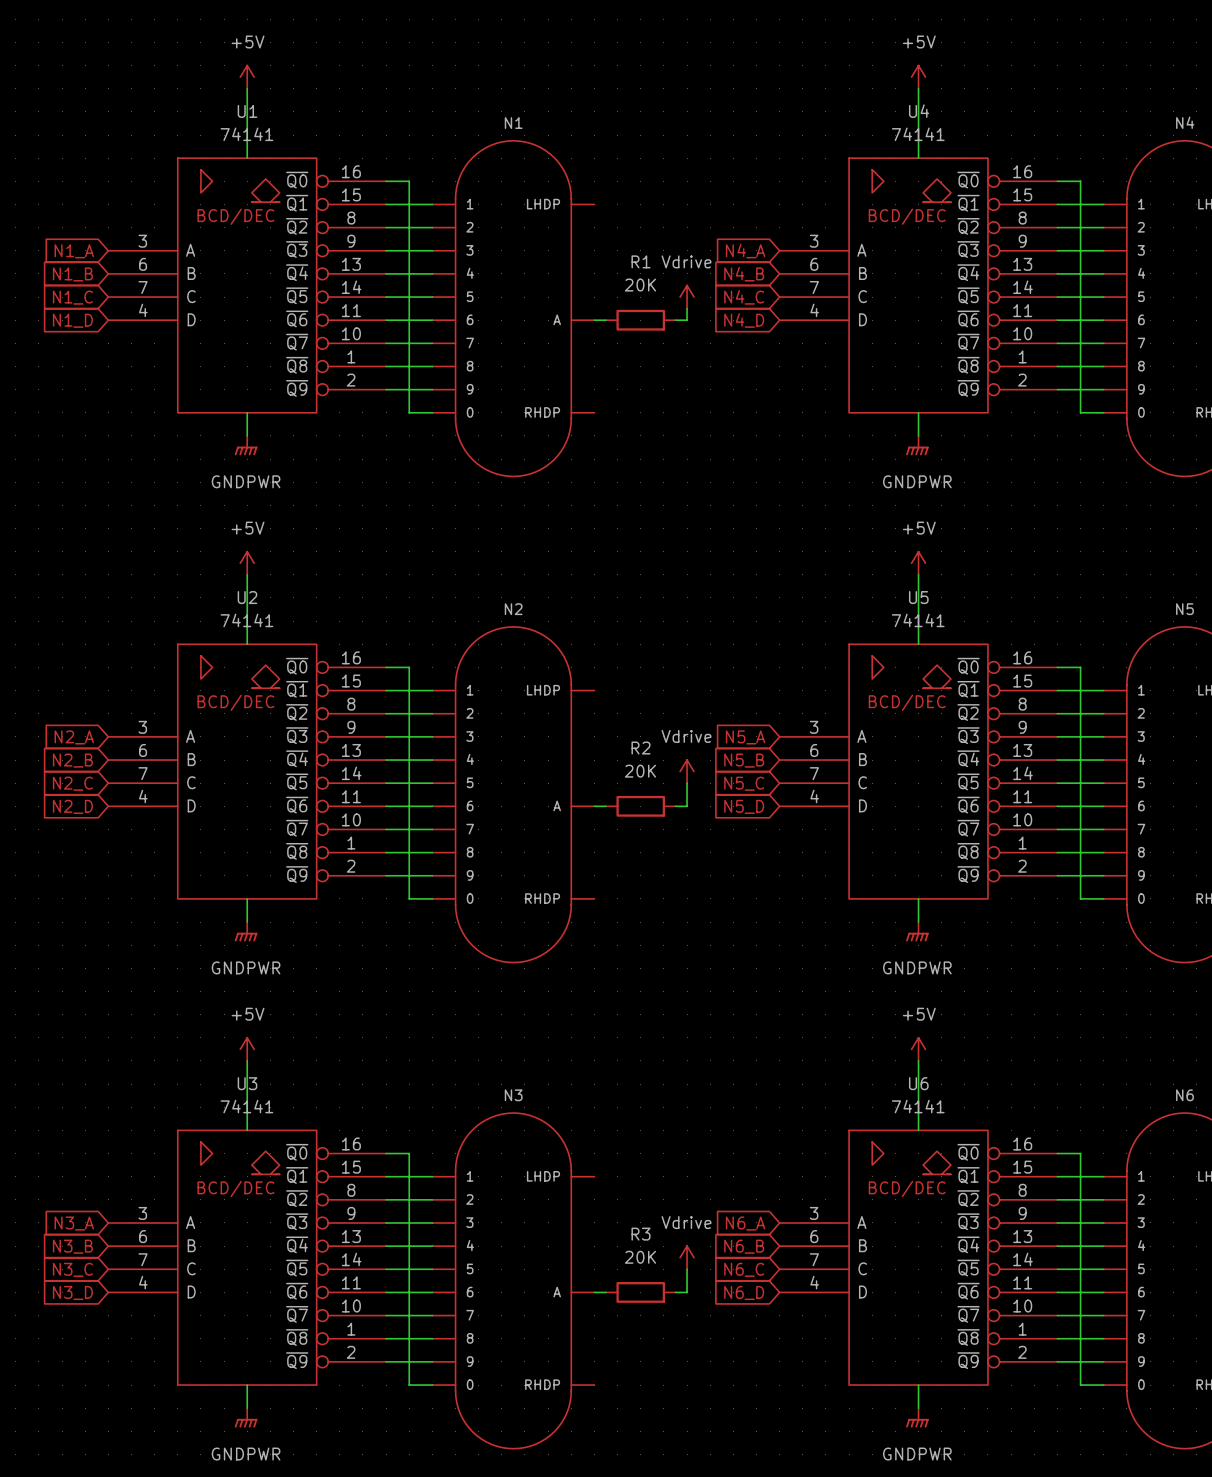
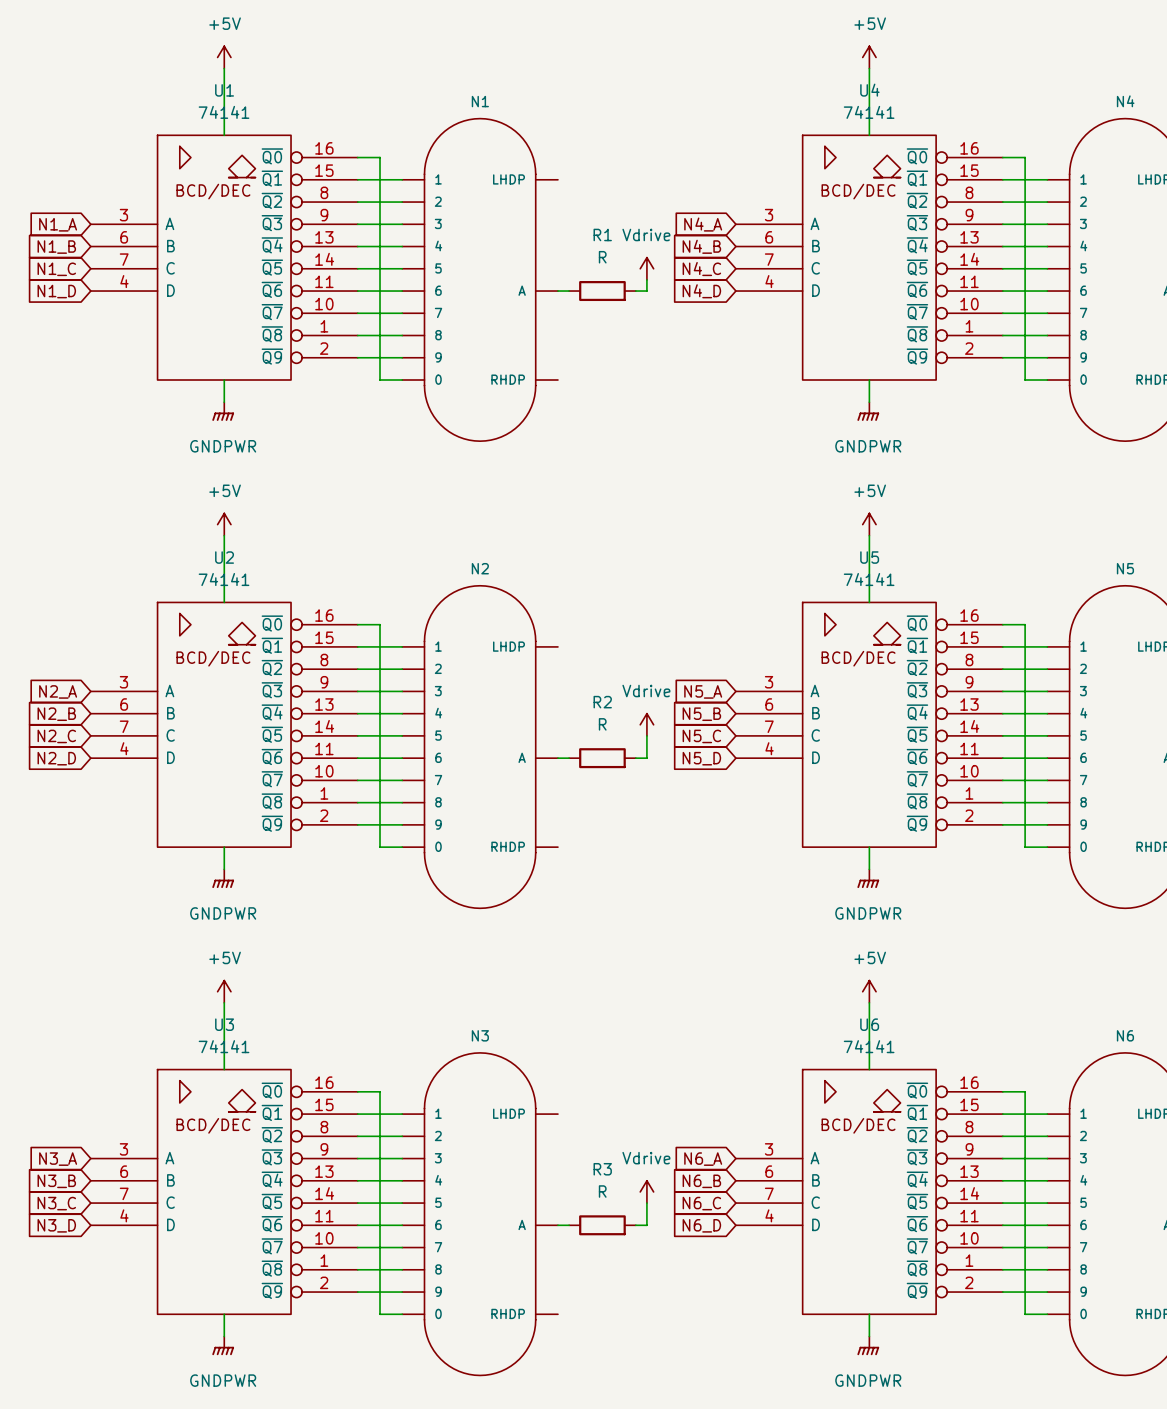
R1 value: 20K (640, 285) -> R (602, 257)
R2 value: 20K (640, 771) -> R (602, 724)
R3 value: 20K (640, 1257) -> R (602, 1191)

